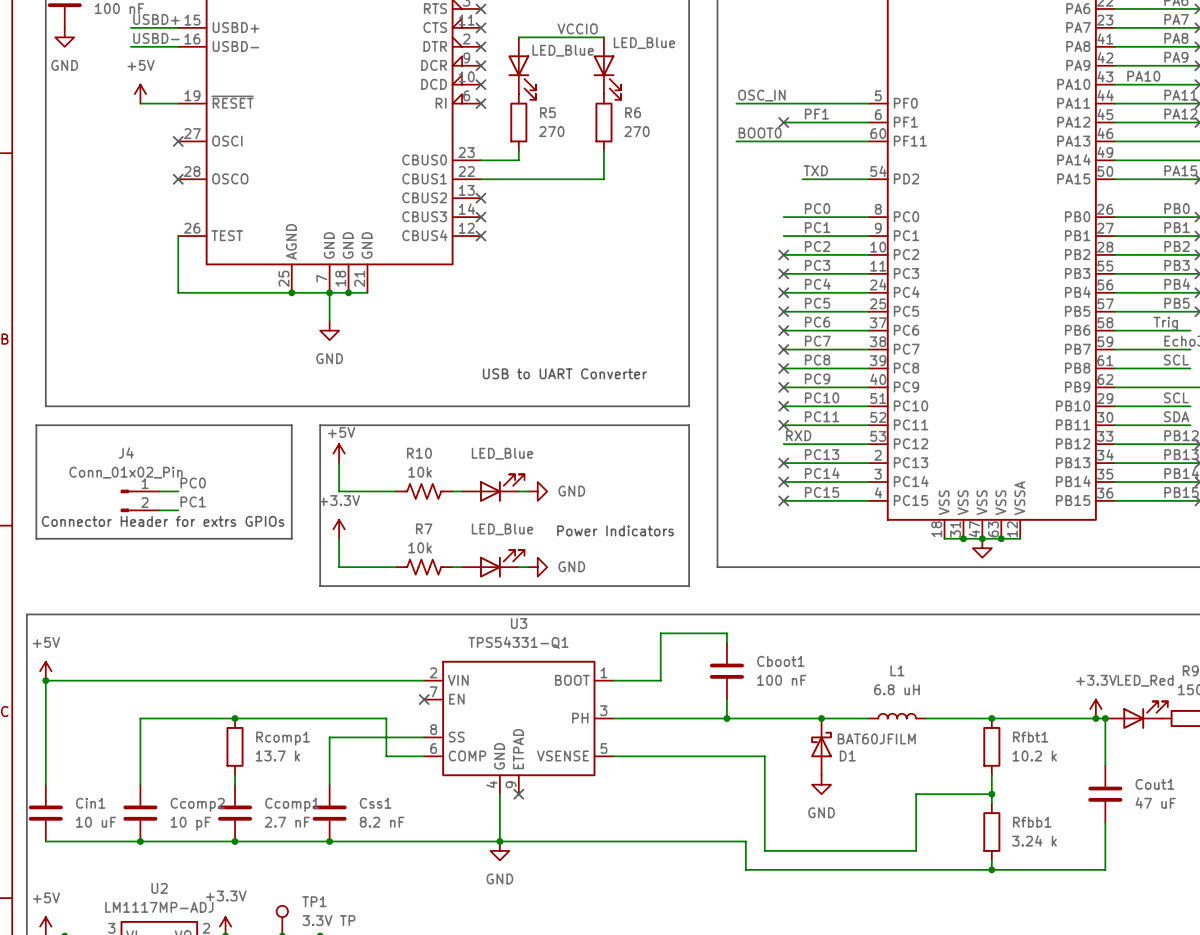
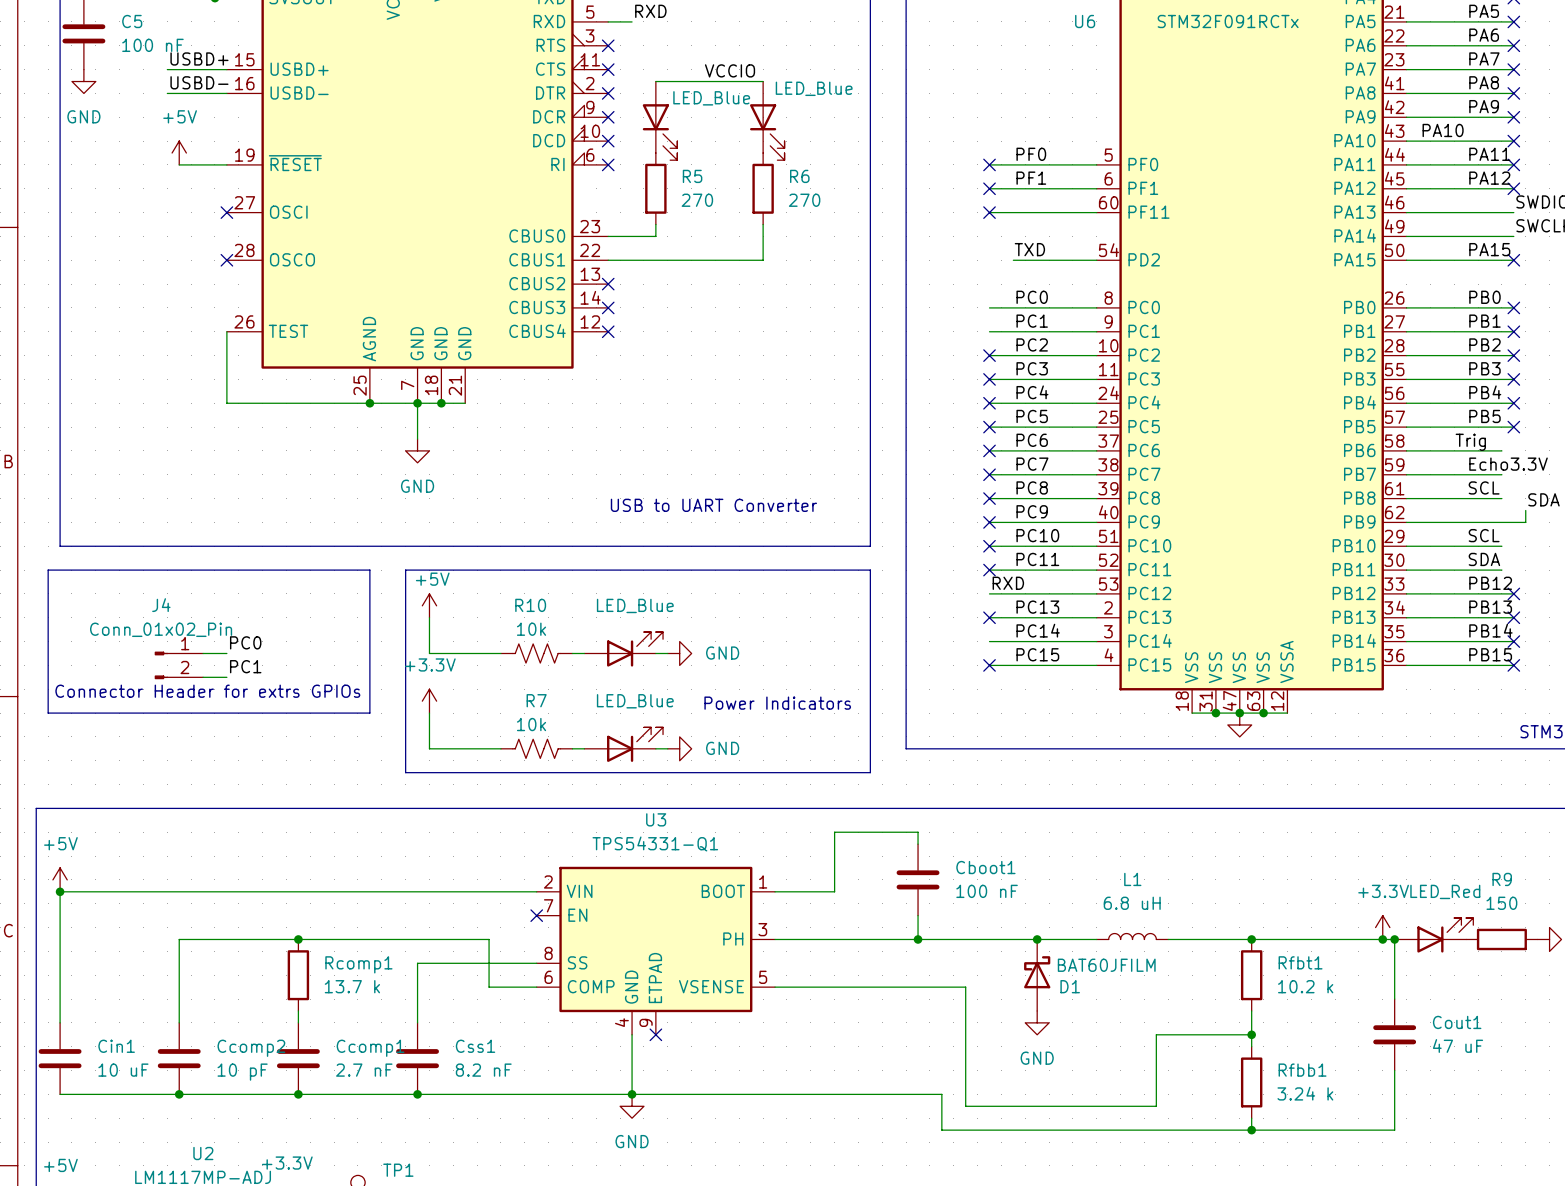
label: OSC_IN (761, 95) -> none
label: none -> PF0 (1031, 154)
wire: (736, 103) (783, 103) -> none
no-connect mark: none -> (989, 164)
label: BOOT0 (760, 132) -> none
wire: (736, 141) (783, 141) -> none
no-connect mark: none -> (989, 212)
no-connect mark: (783, 482) -> none

